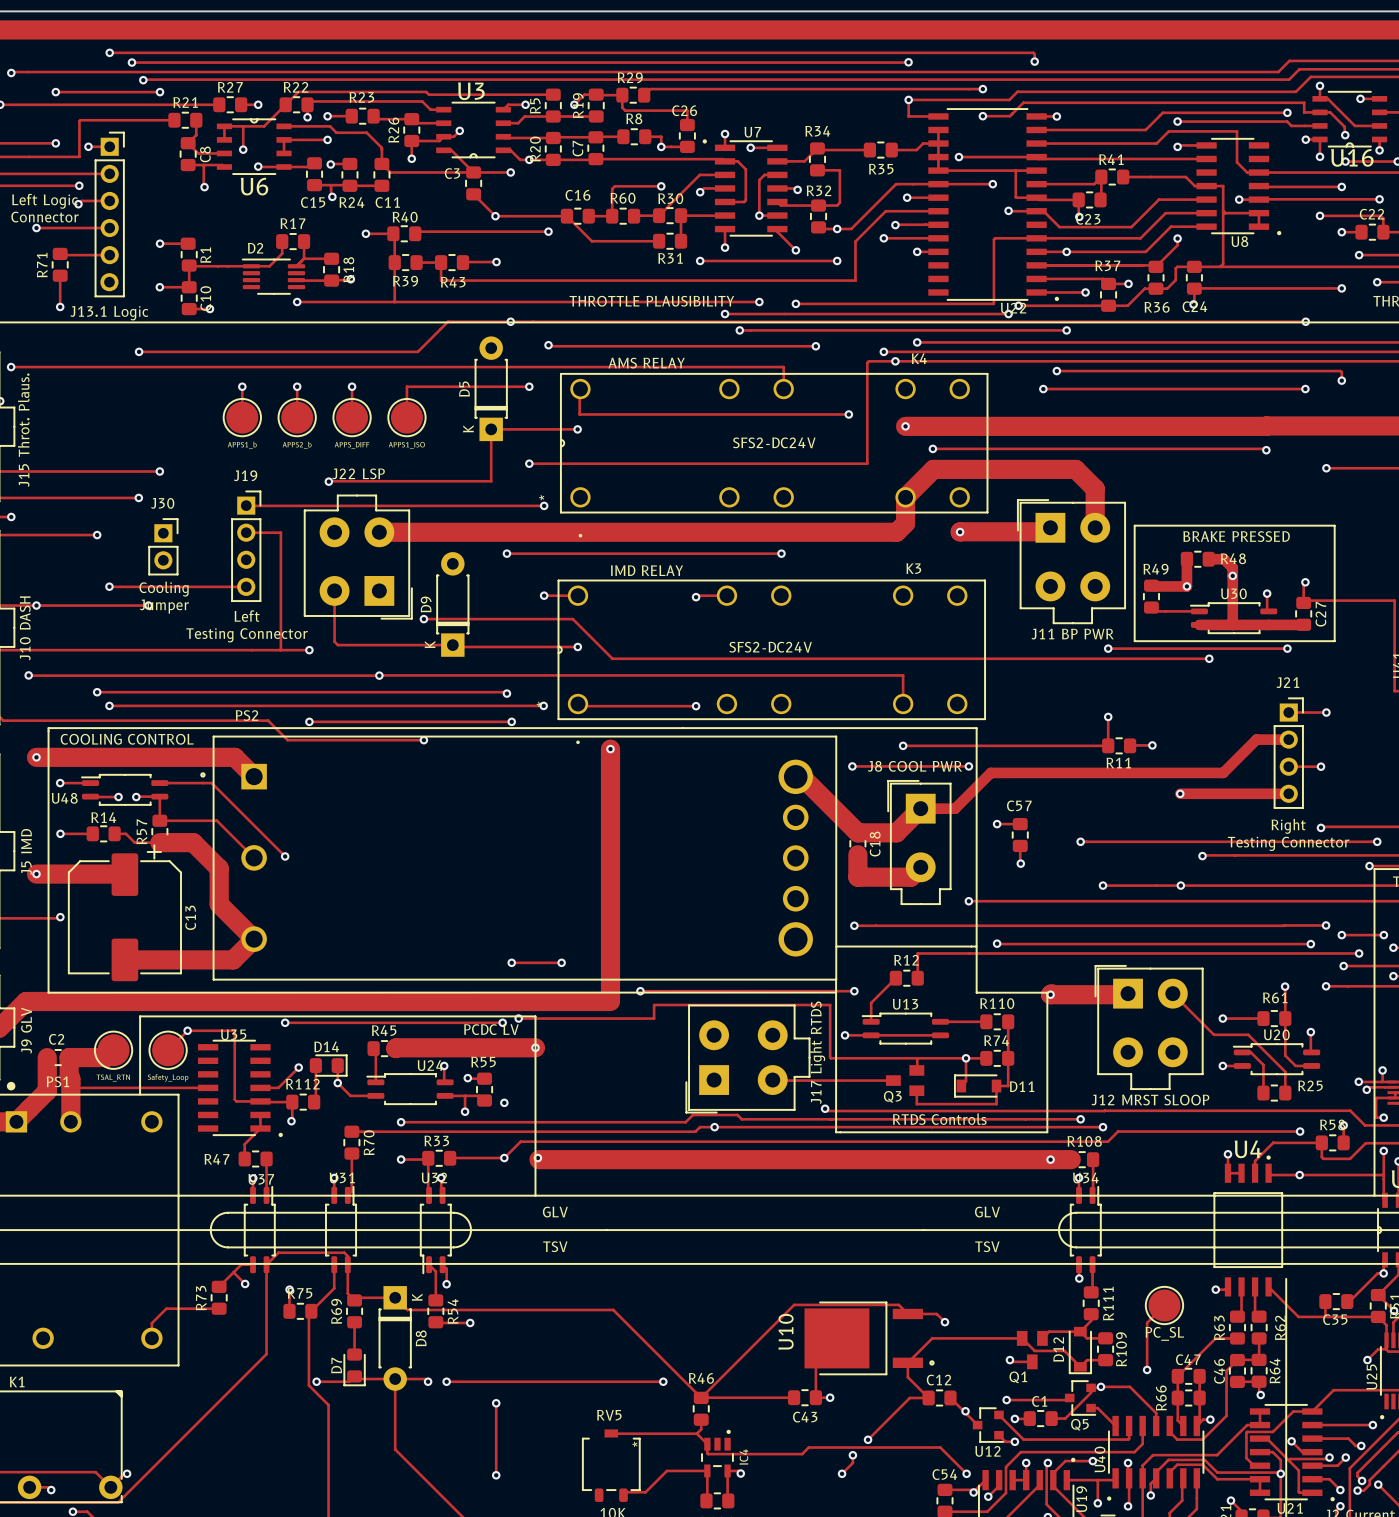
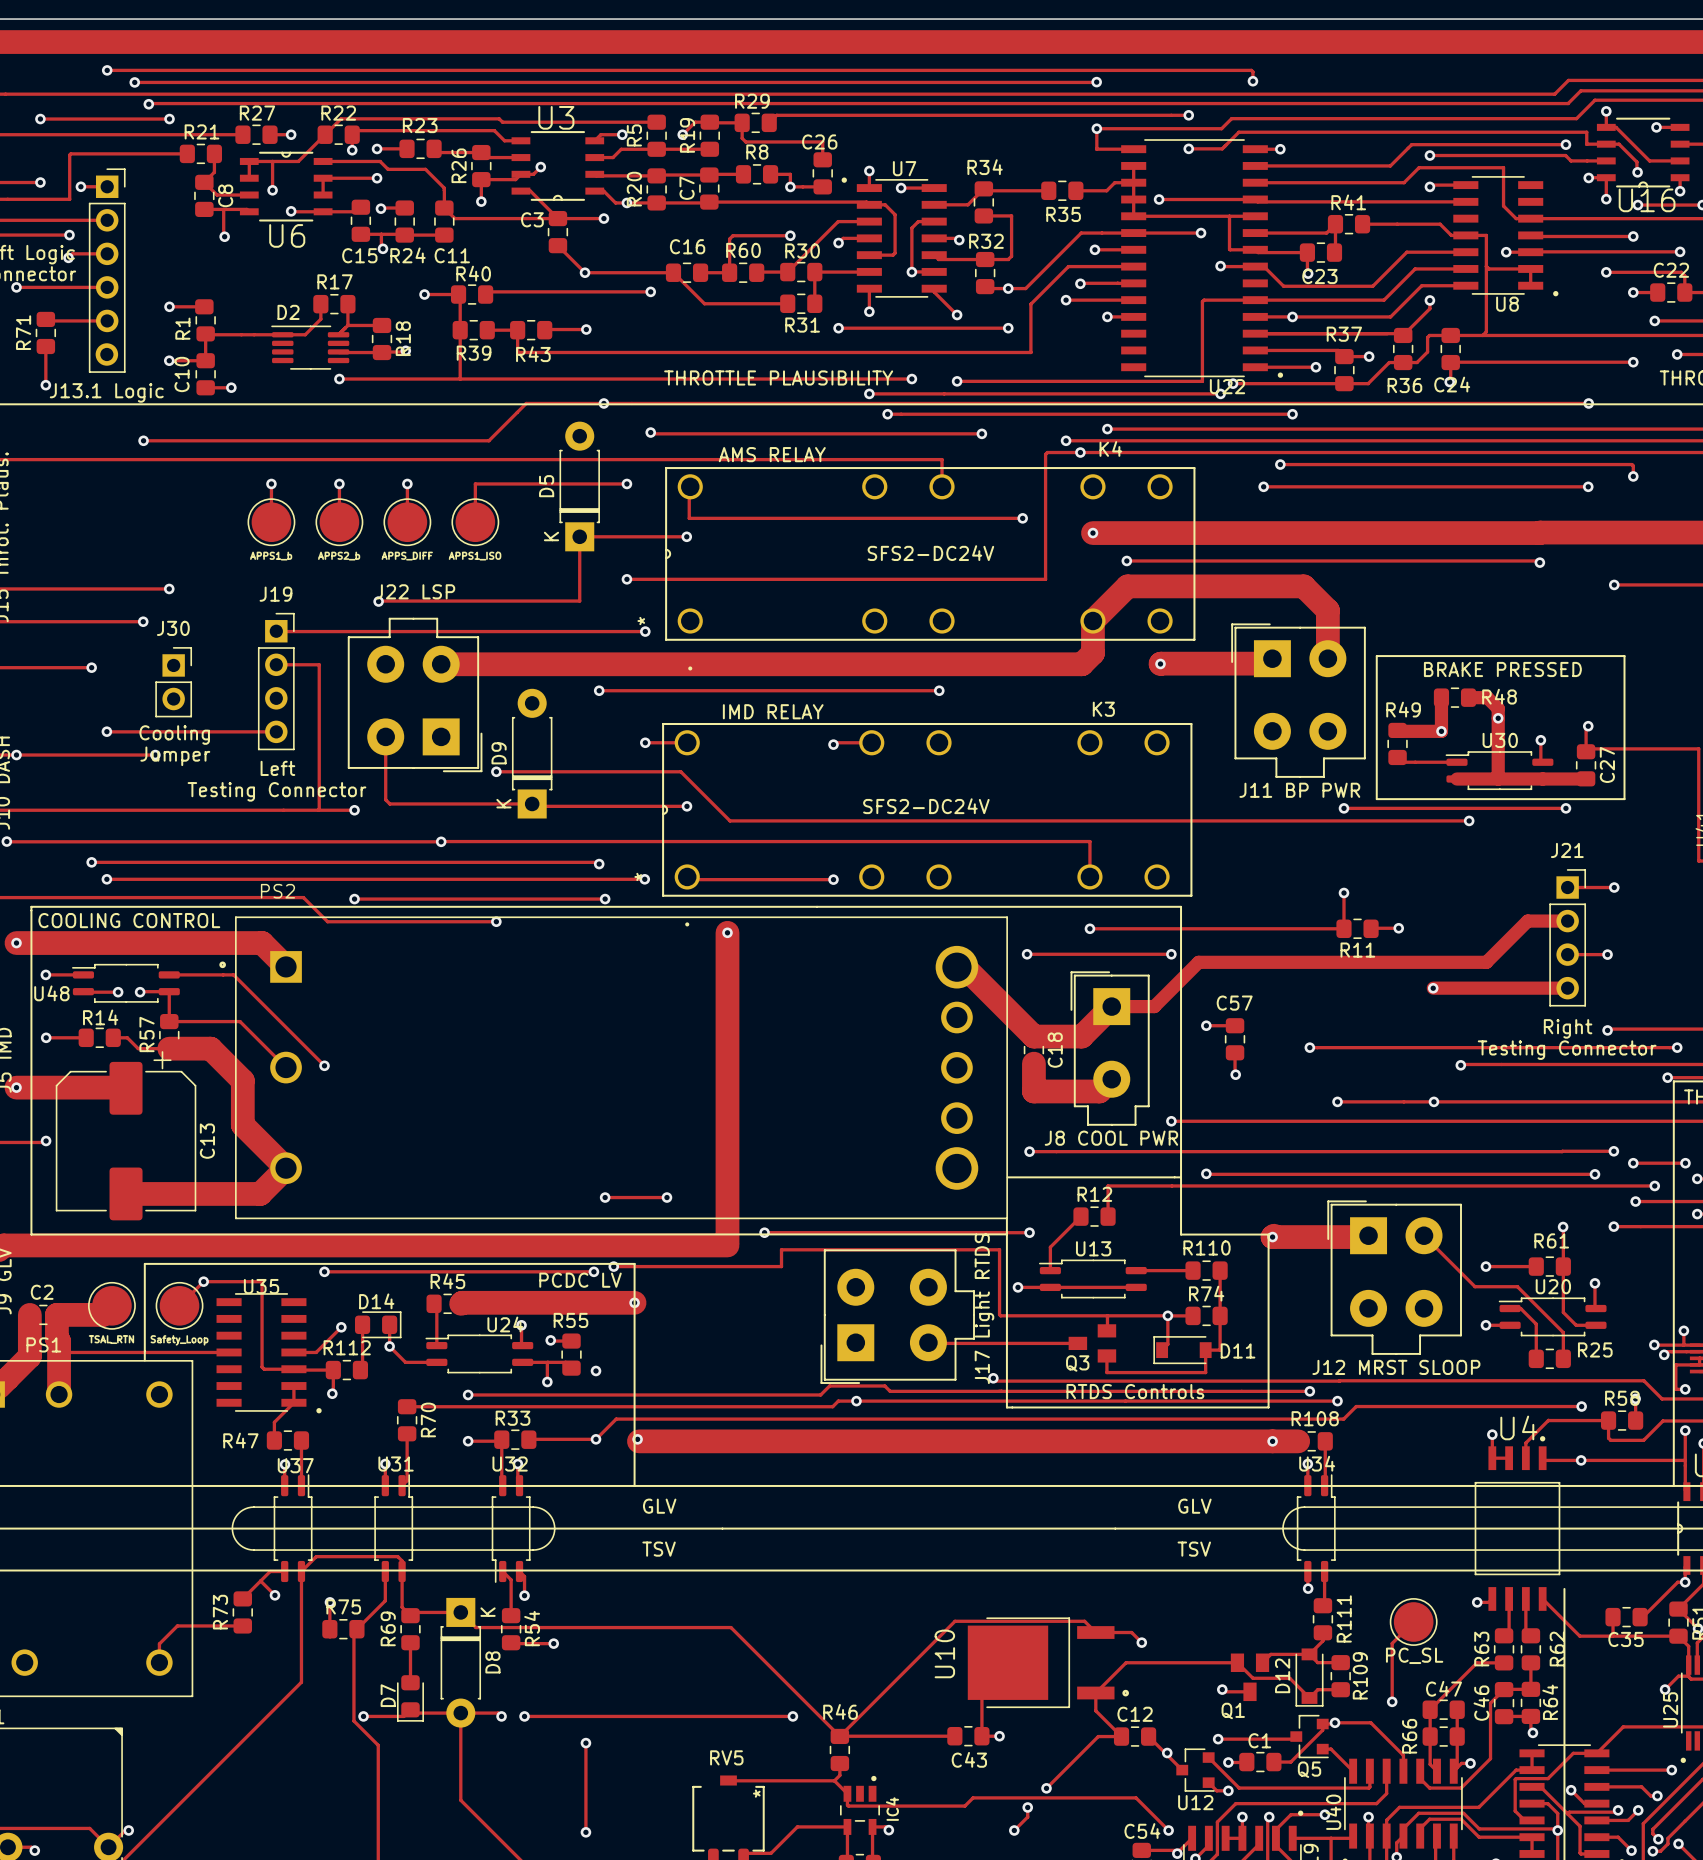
R1 name position: R1 (205, 255) -> R1 (182, 328)
C10 name position: C10 (205, 298) -> C10 (182, 374)
J8 COOL PWR name position: J8 COOL PWR (914, 766) -> J8 COOL PWR (1111, 1138)

